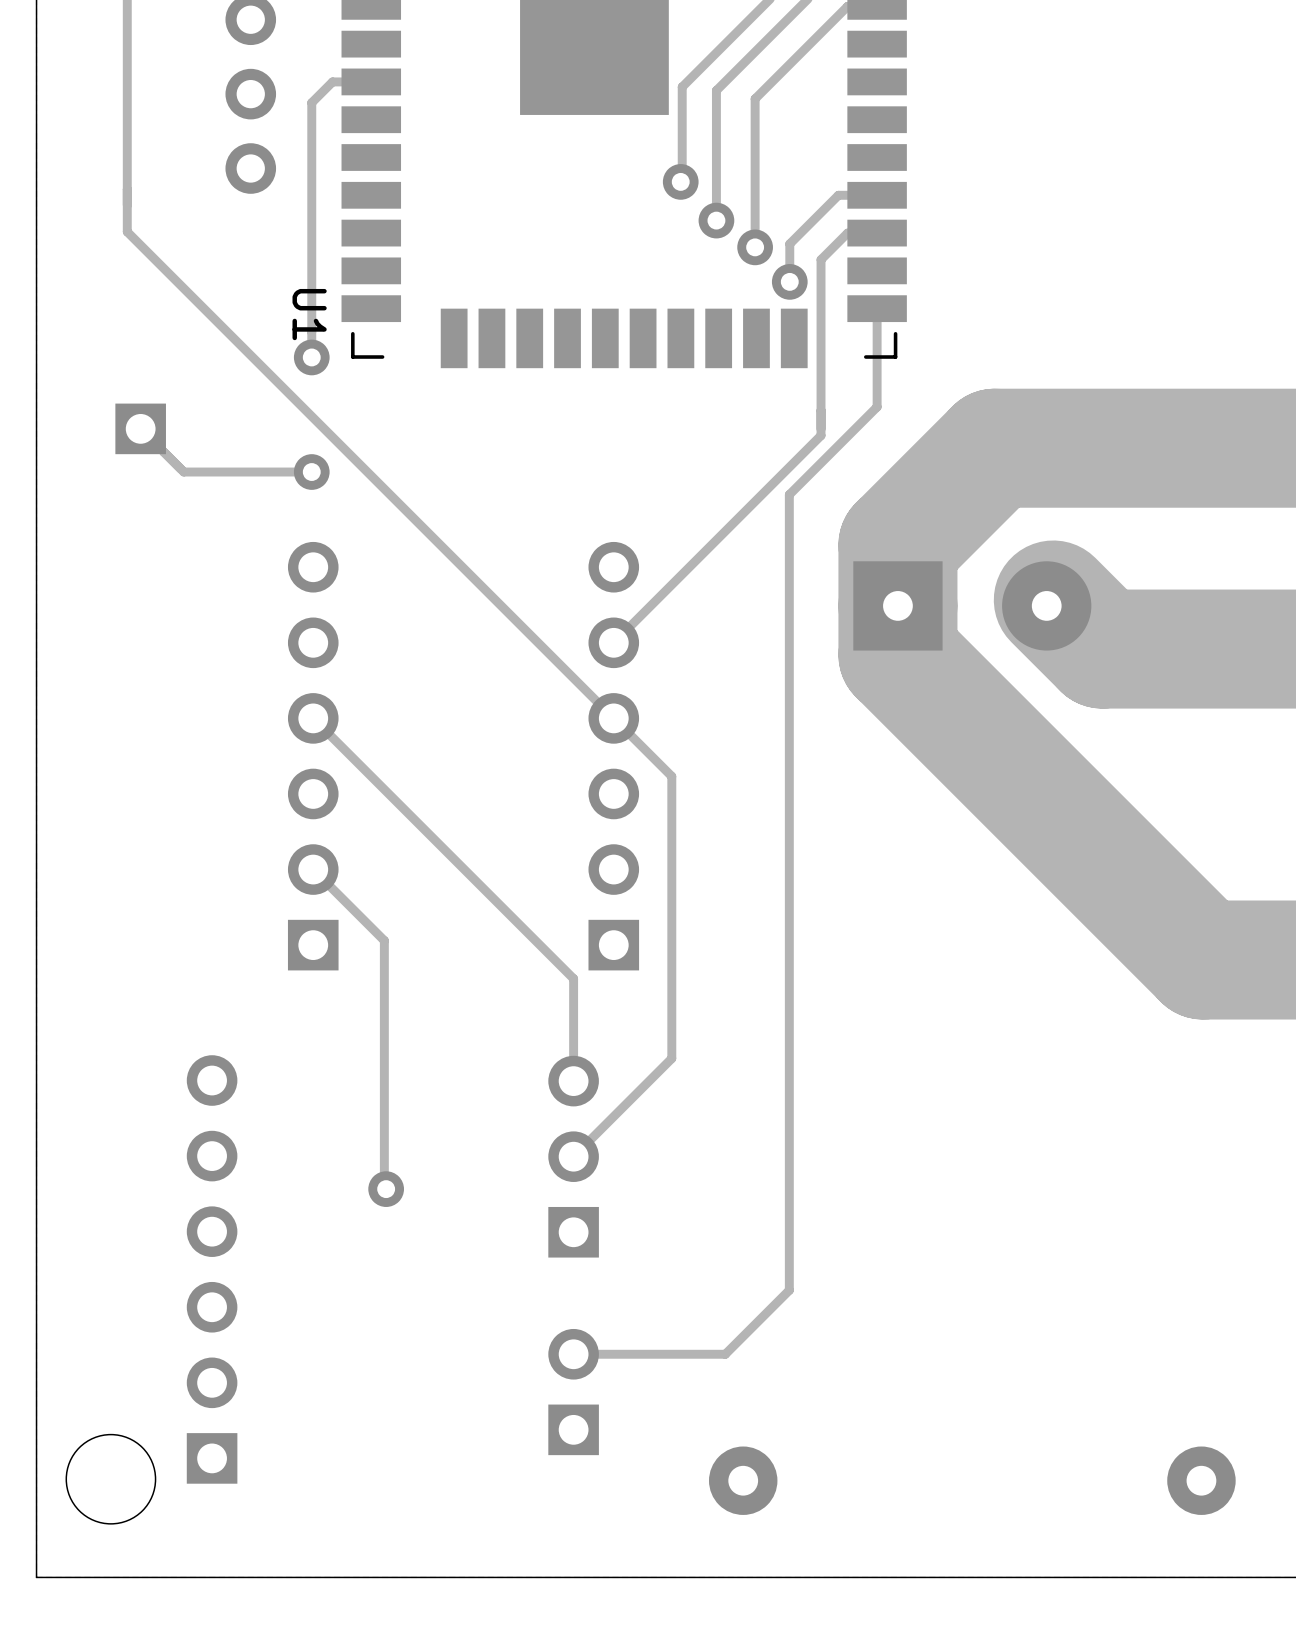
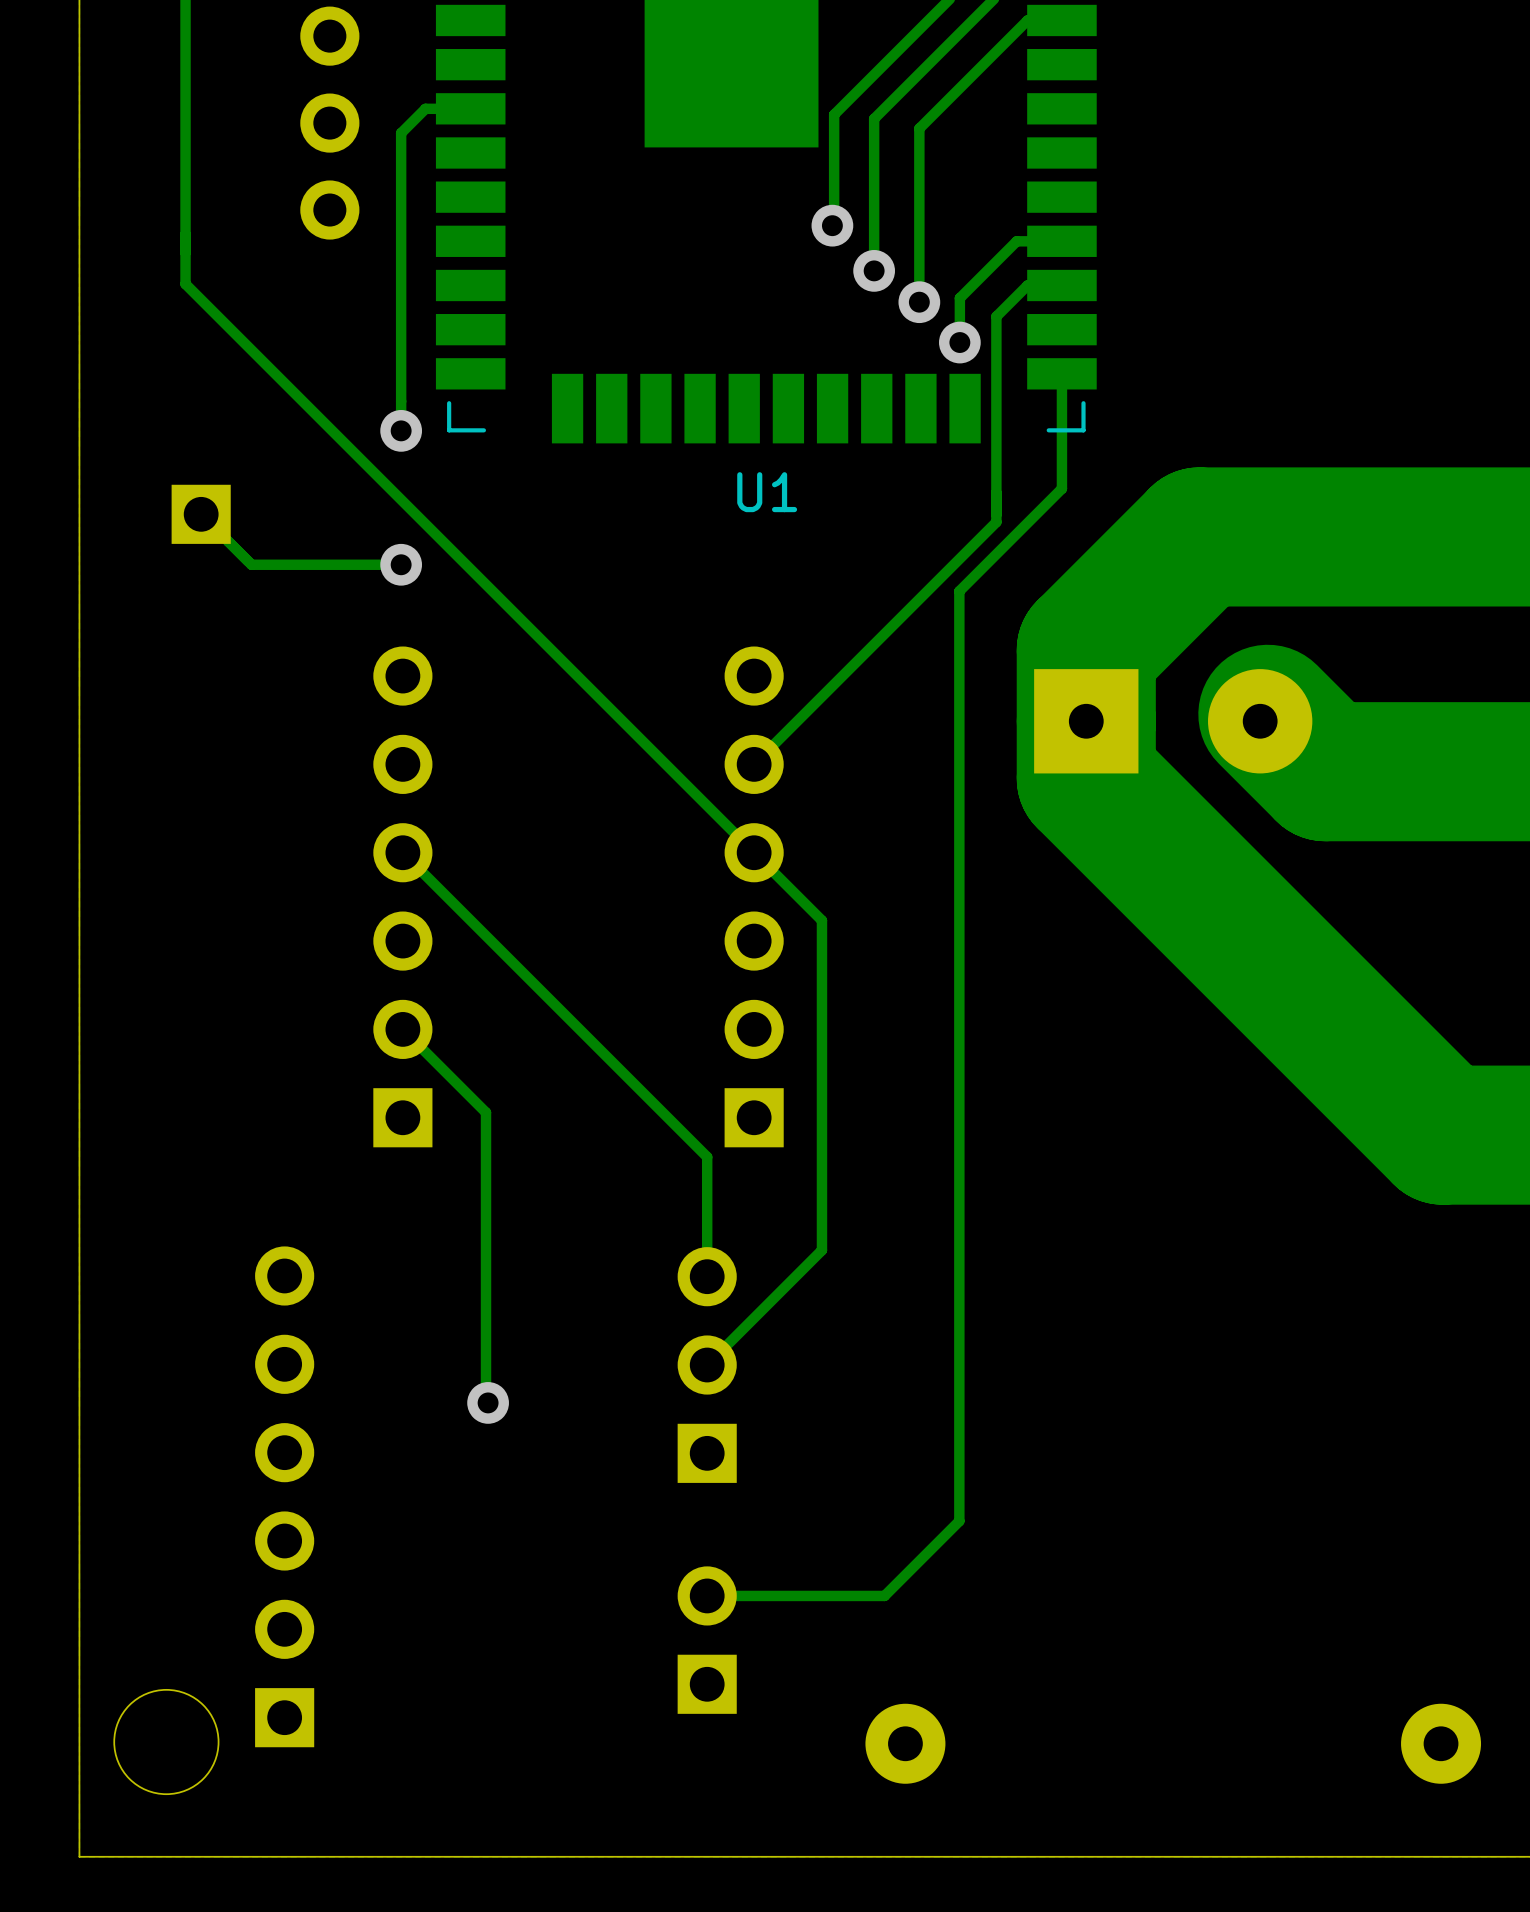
U1 name rotation: 0° (309, 314) -> 90° counterclockwise (767, 492)
U1 name position: U1 (309, 314) -> U1 (767, 492)

